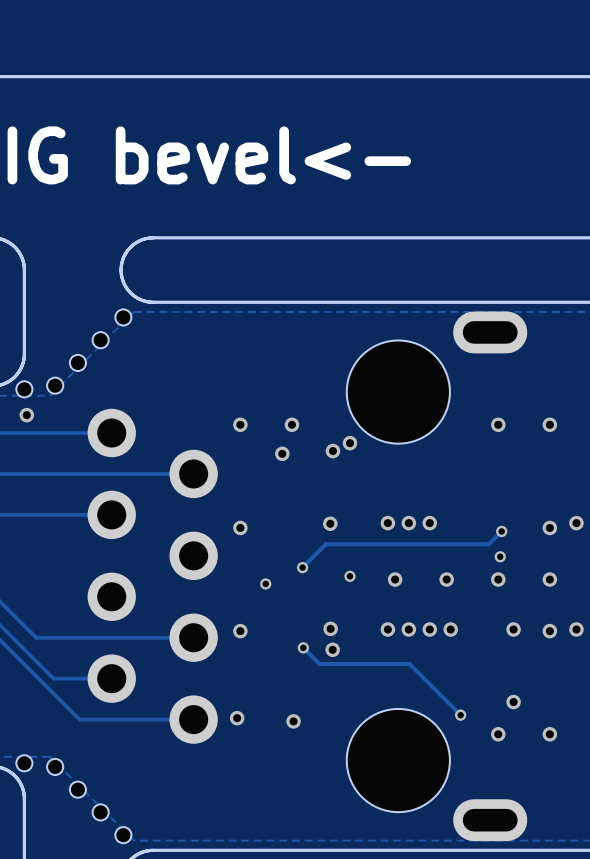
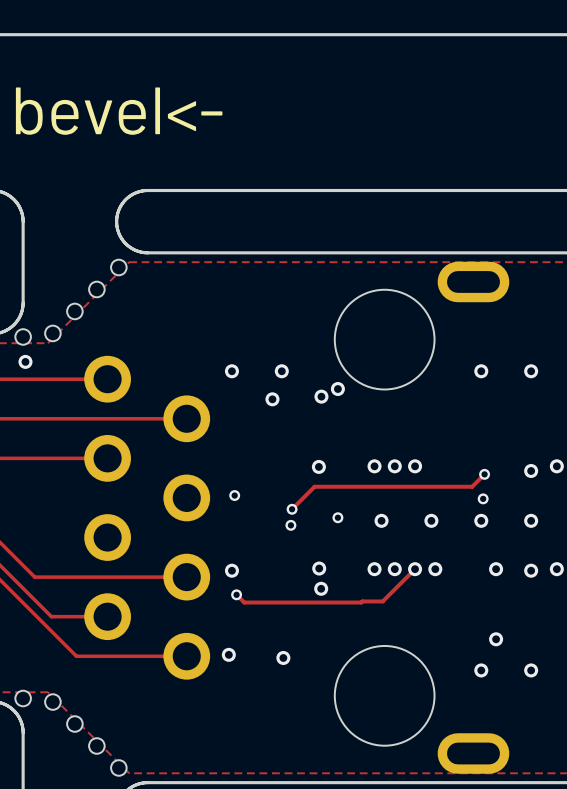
via: (240, 527) -> none
via: none -> (234, 495)
via: (265, 583) -> none
via: none -> (290, 525)
track: (303, 647) (319, 664) -> (236, 594) (244, 602) (308, 602)
via: (303, 647) -> none
via: none -> (236, 594)
track: (374, 664) (409, 664) (460, 715) -> (361, 602) (382, 601) (415, 569)
via: (460, 715) -> none

